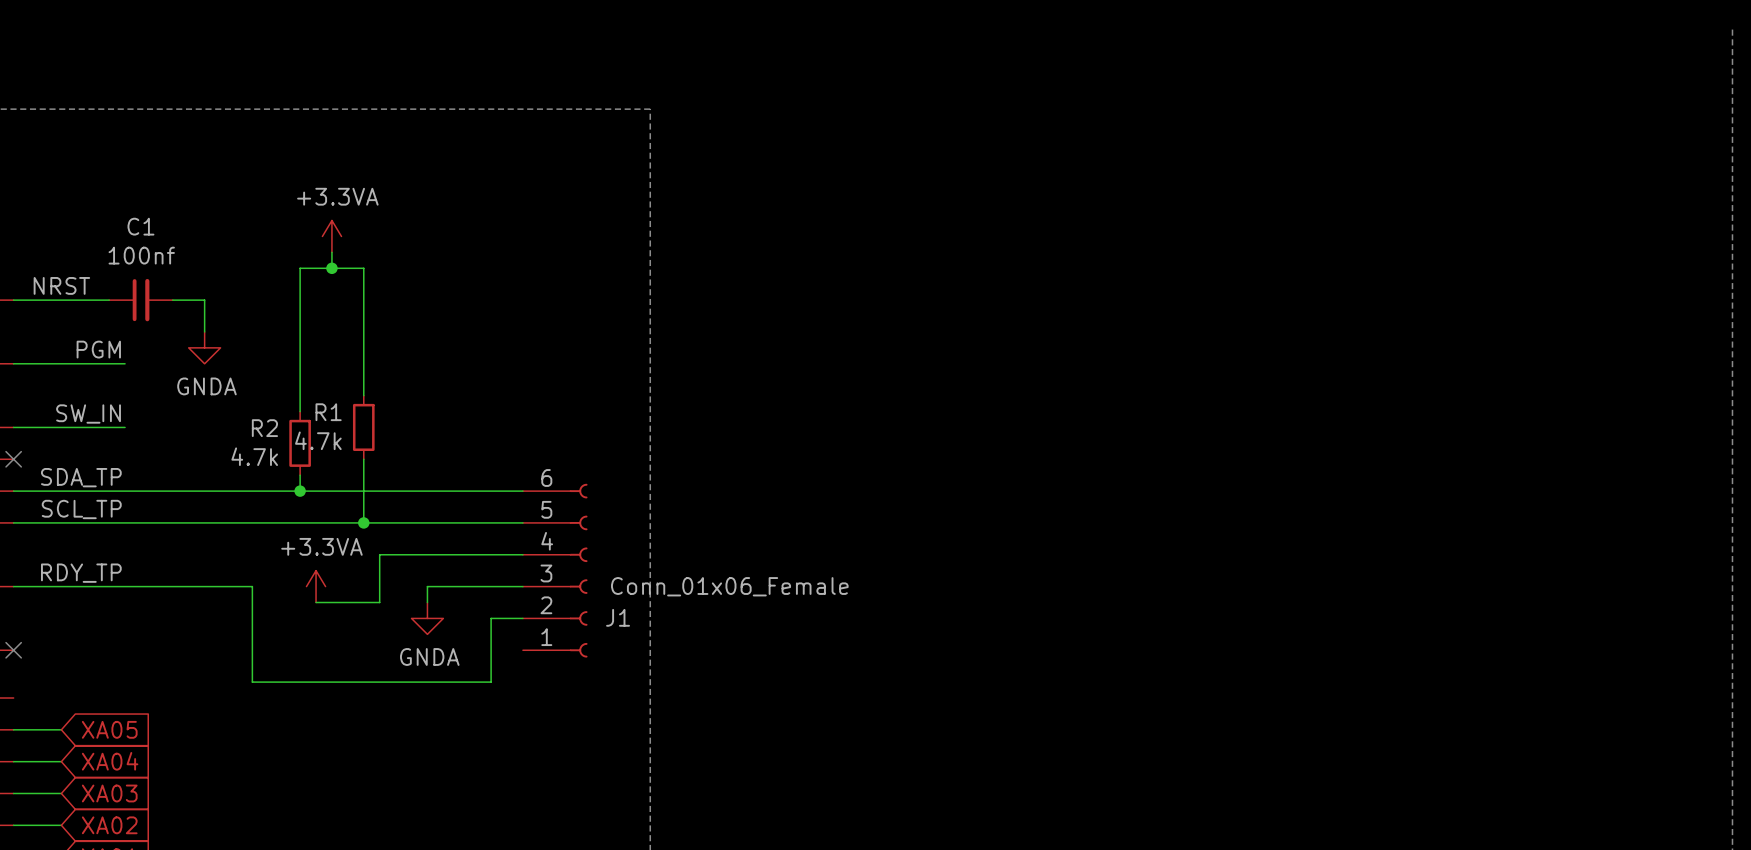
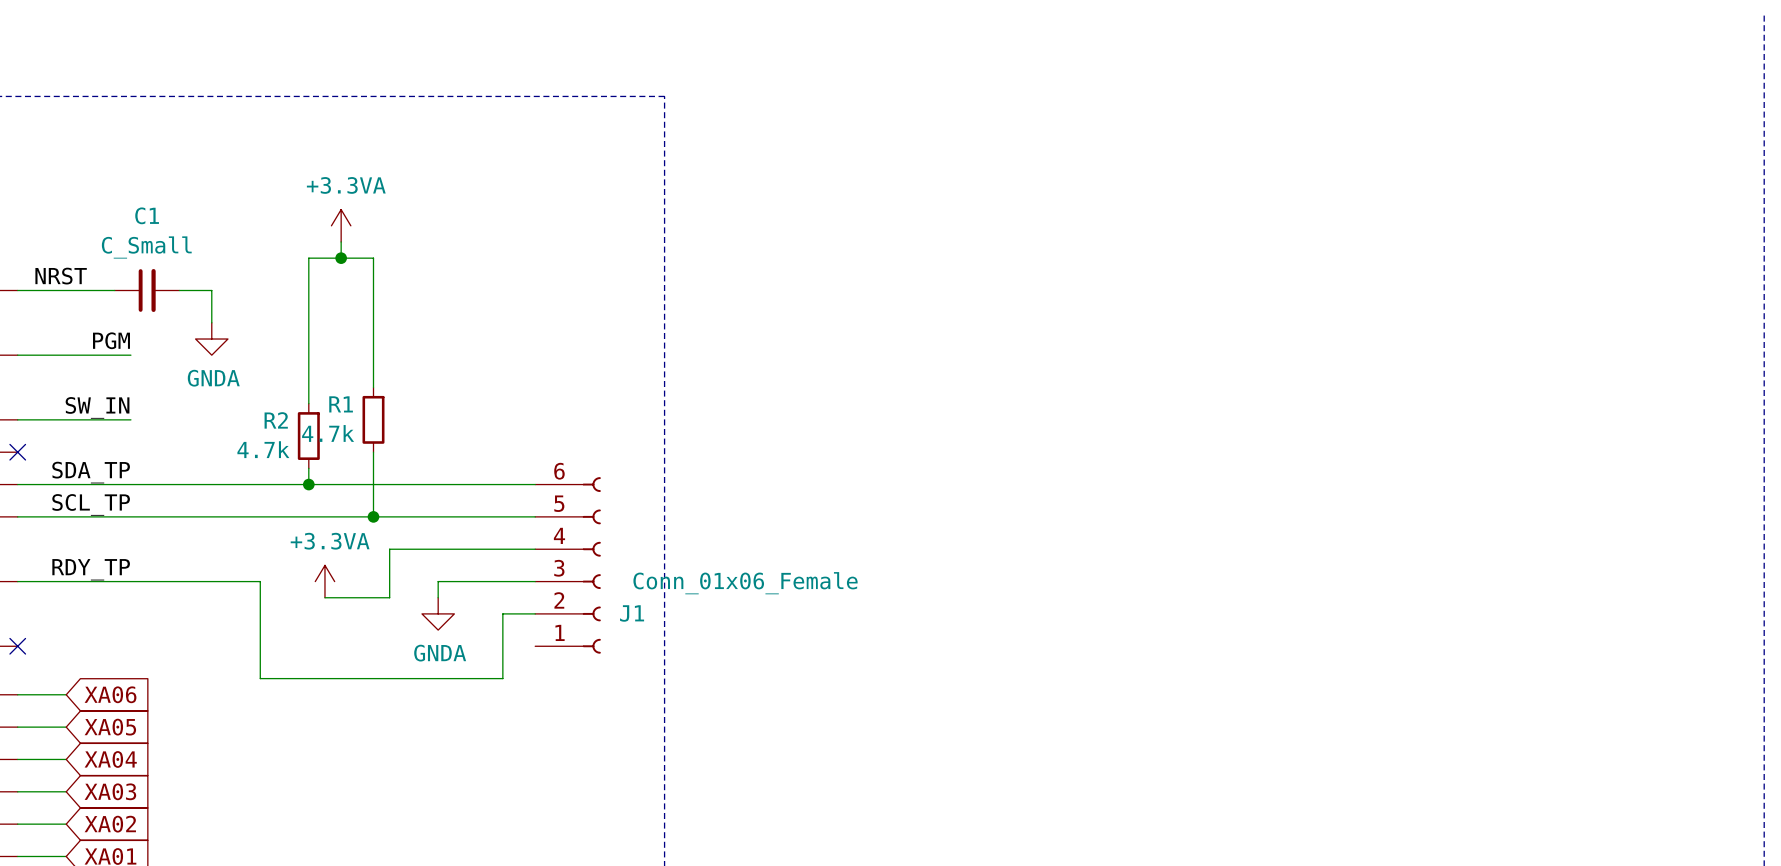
C1 value: 100nf (141, 255) -> C_Small (146, 247)
wire: none -> (17, 694) (66, 694)
global label: none -> XA06 (110, 694)

